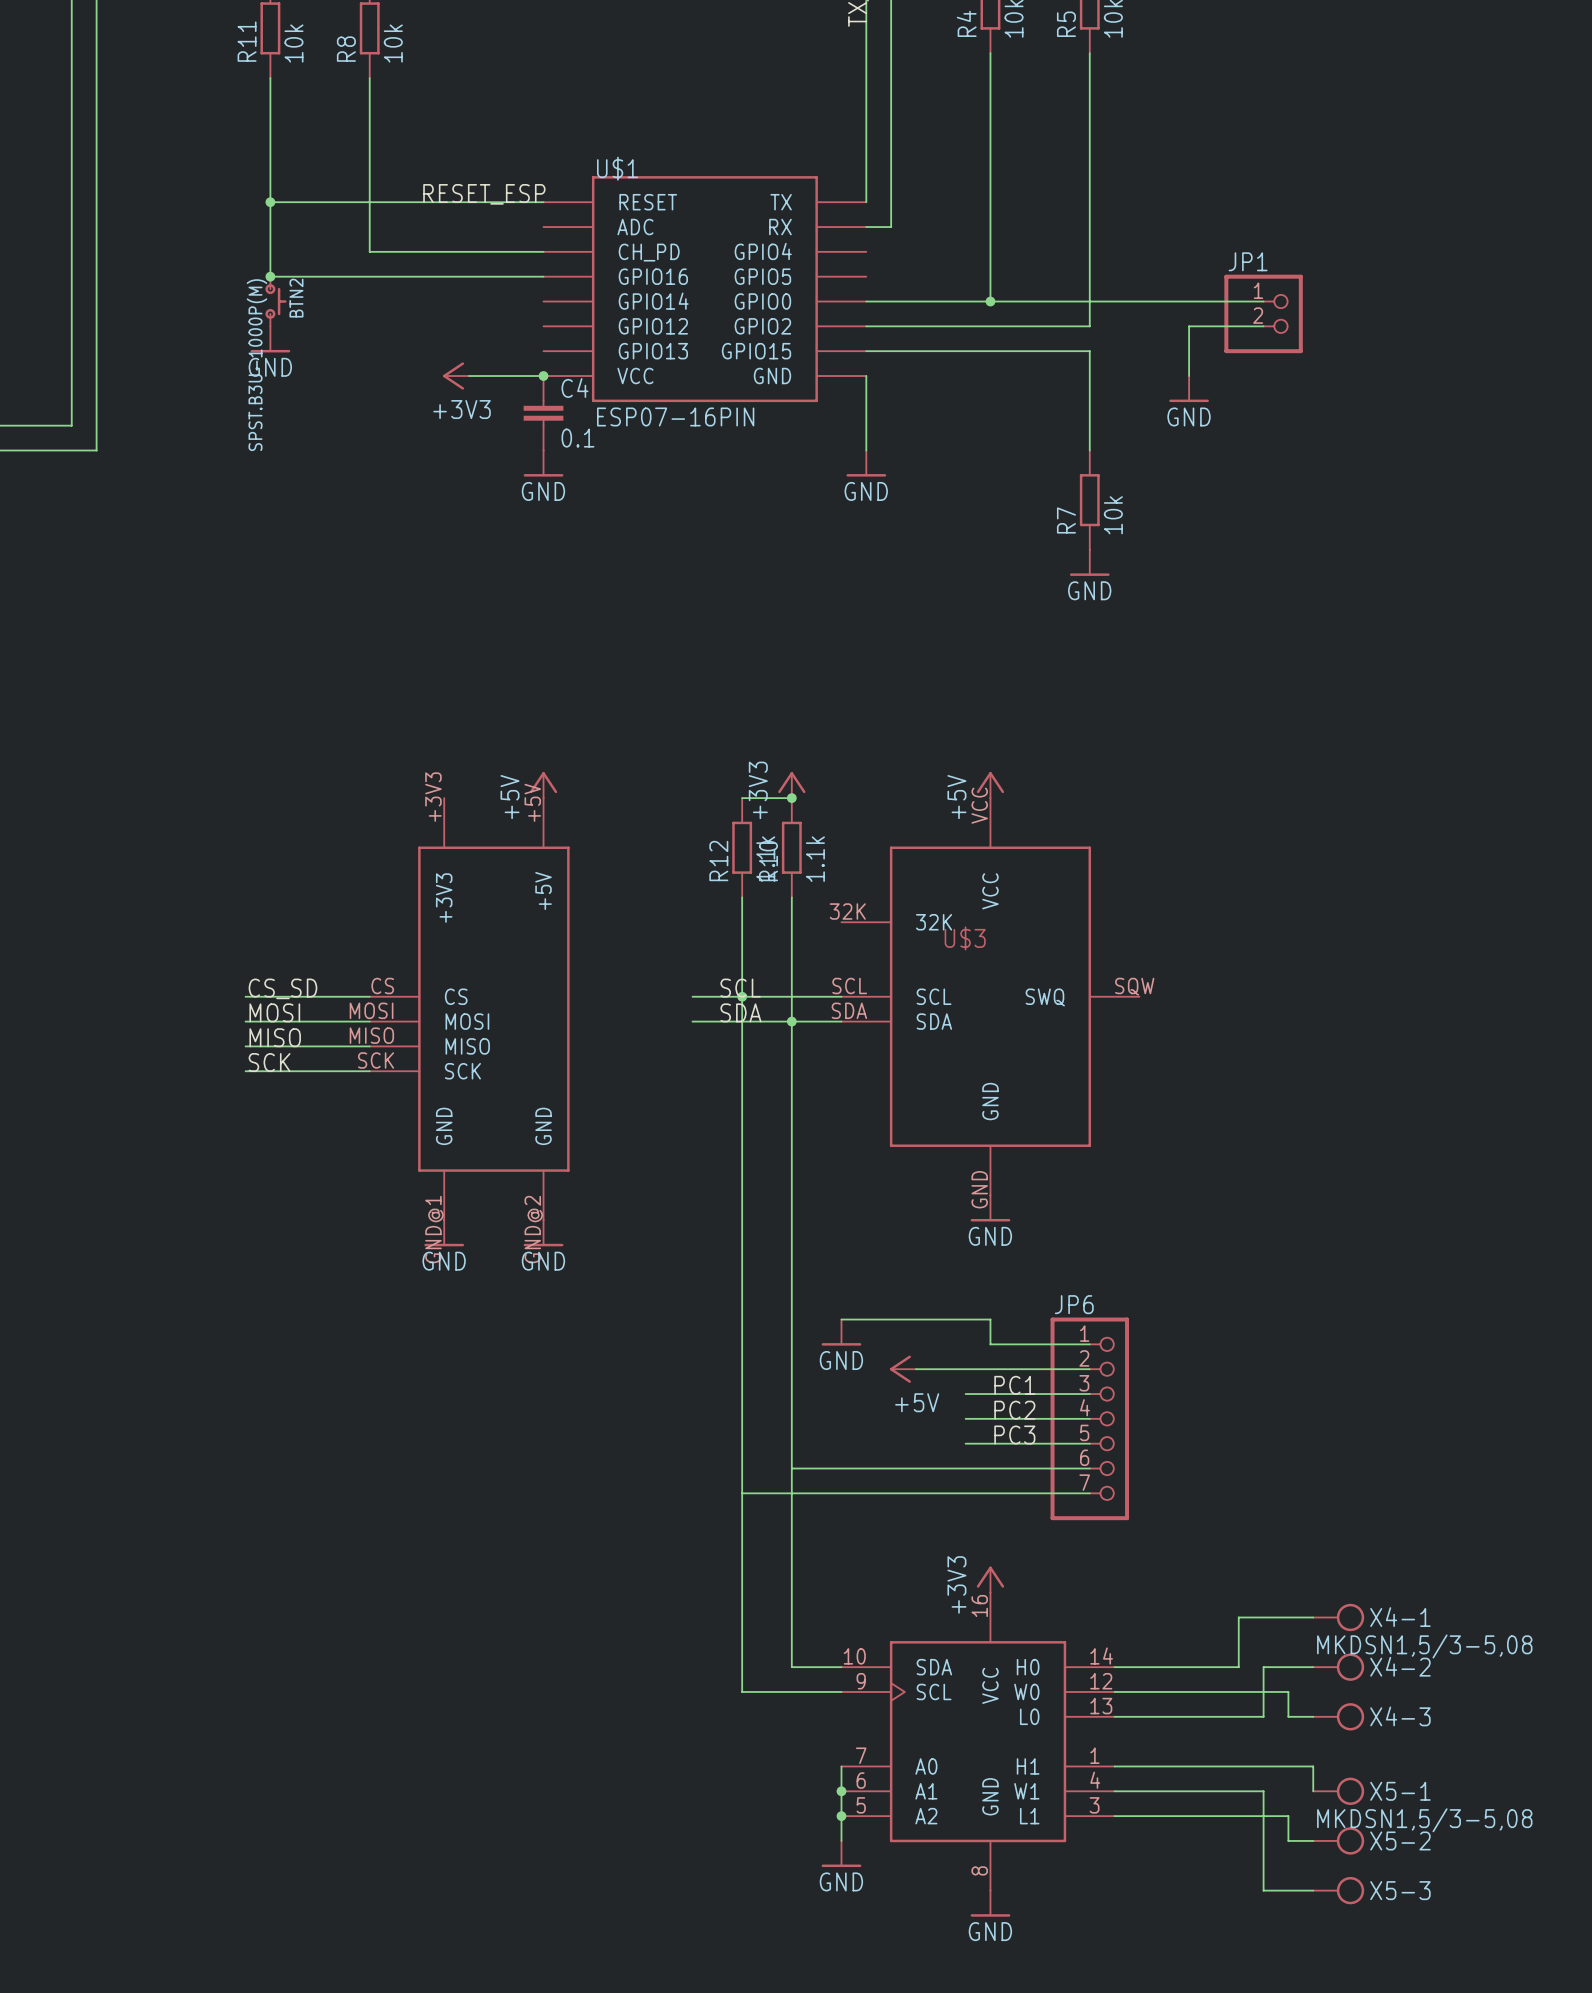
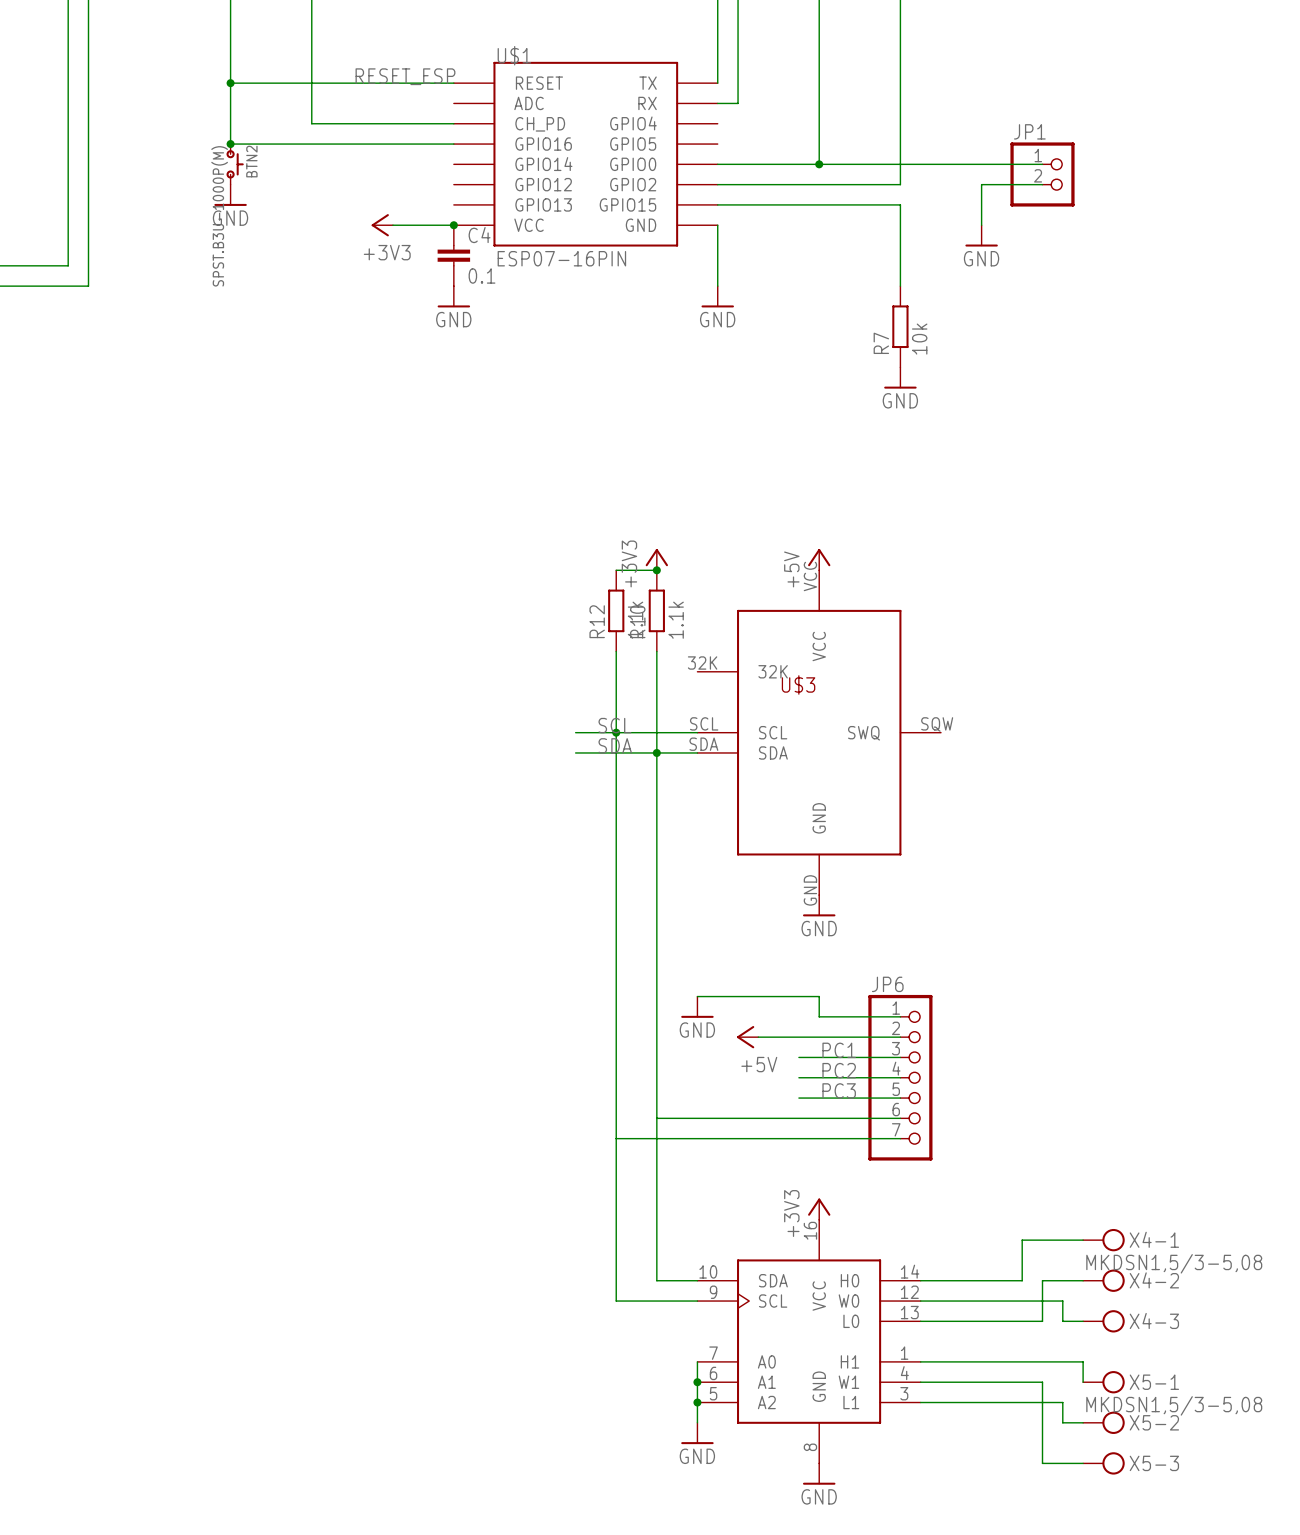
power symbol: +5V (543, 785) -> none
label: CS_SD (282, 988) -> none
wire: (245, 996) (369, 996) -> none
part: (469, 1009) -> none
label: MOSI (274, 1012) -> none
wire: (245, 1021) (369, 1021) -> none
label: MISO (275, 1037) -> none
wire: (245, 1046) (369, 1046) -> none
label: SCK (269, 1062) -> none
wire: (245, 1071) (369, 1071) -> none
power symbol: GND (444, 1233) -> none
power symbol: GND (543, 1233) -> none

